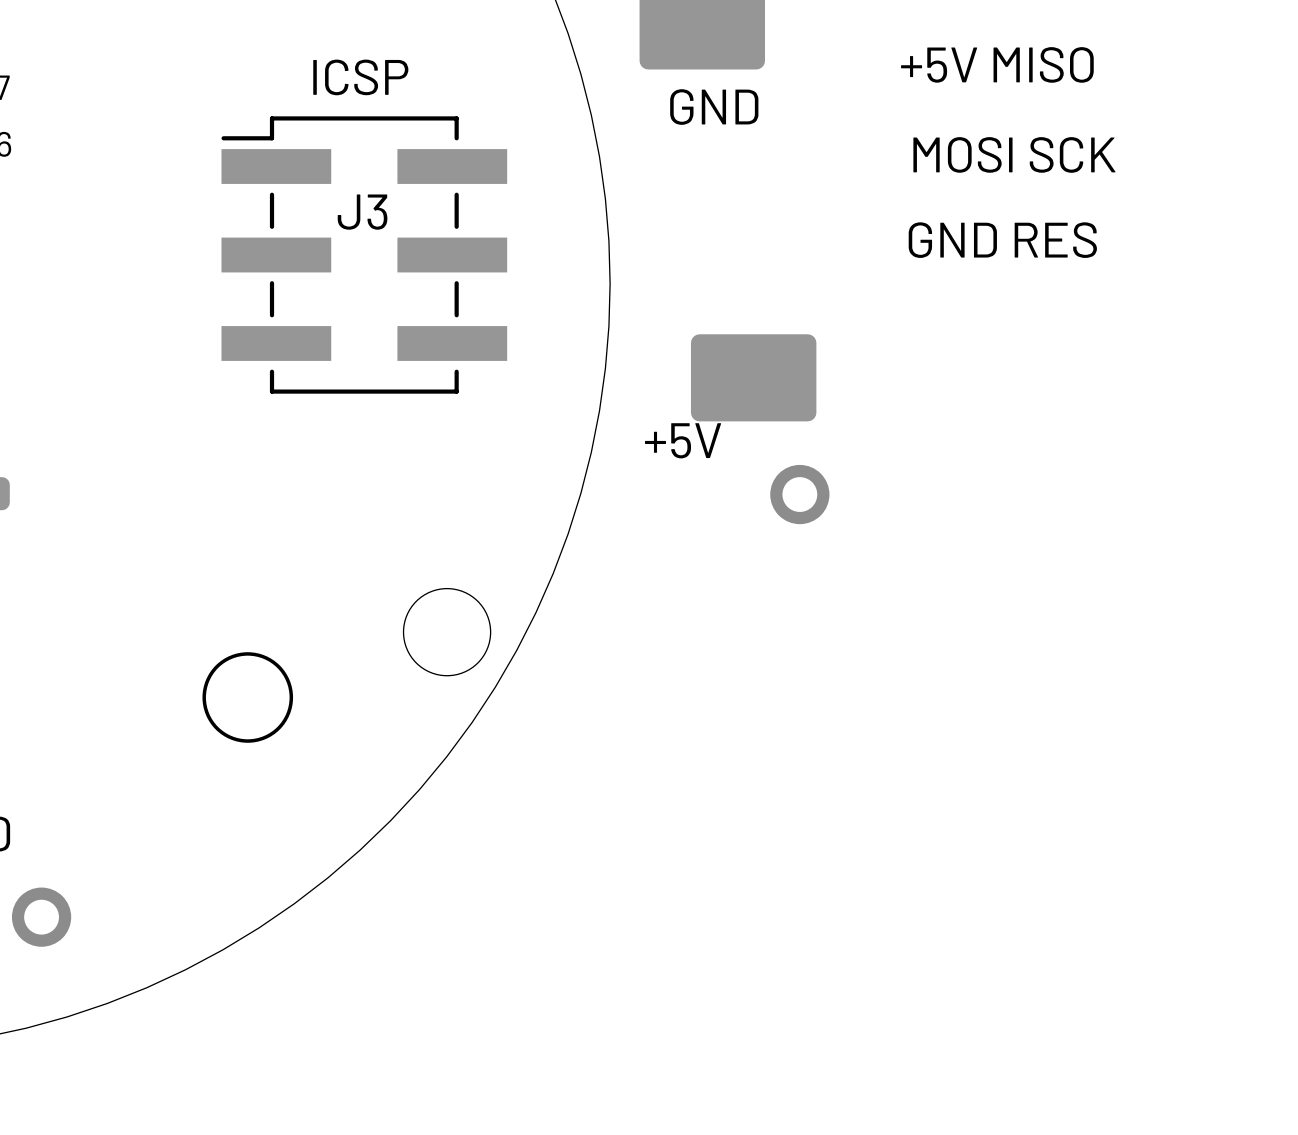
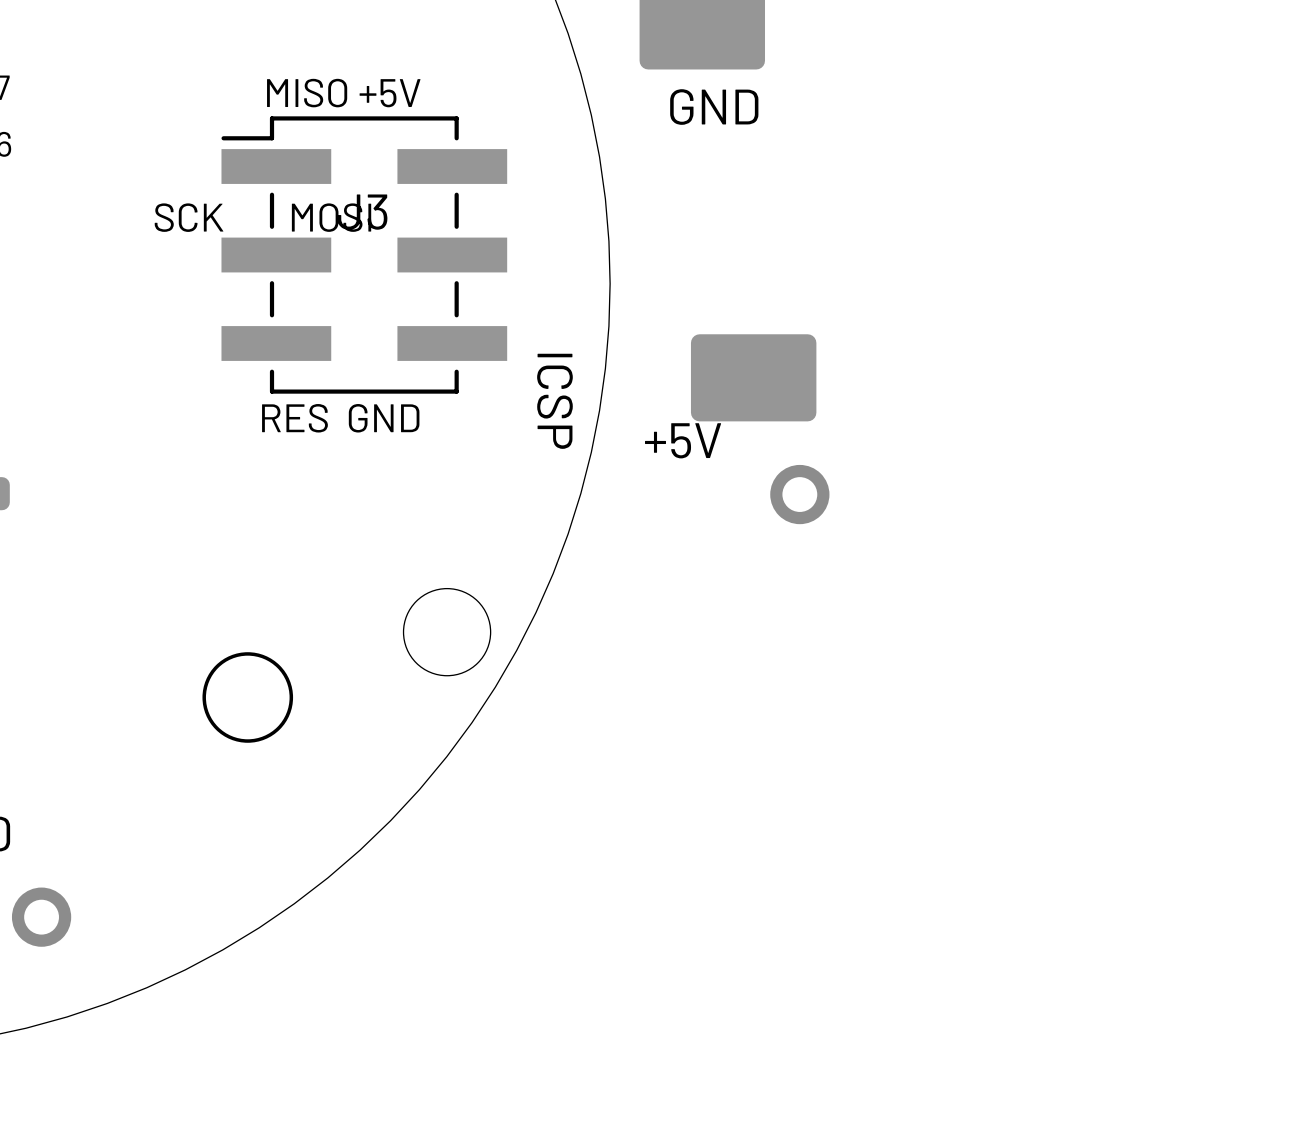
text: +5V MISO (997, 64) -> none
text rotation: 0° (360, 77) -> 90° clockwise (554, 401)
text position: ICSP (360, 77) -> ICSP (554, 401)
text: none -> MISO +5V (343, 93)
text: MOSI SCK (1014, 154) -> none
text: none -> SCK MOSI (262, 217)
text: GND RES (1002, 240) -> none
text: none -> RES GND (340, 418)

